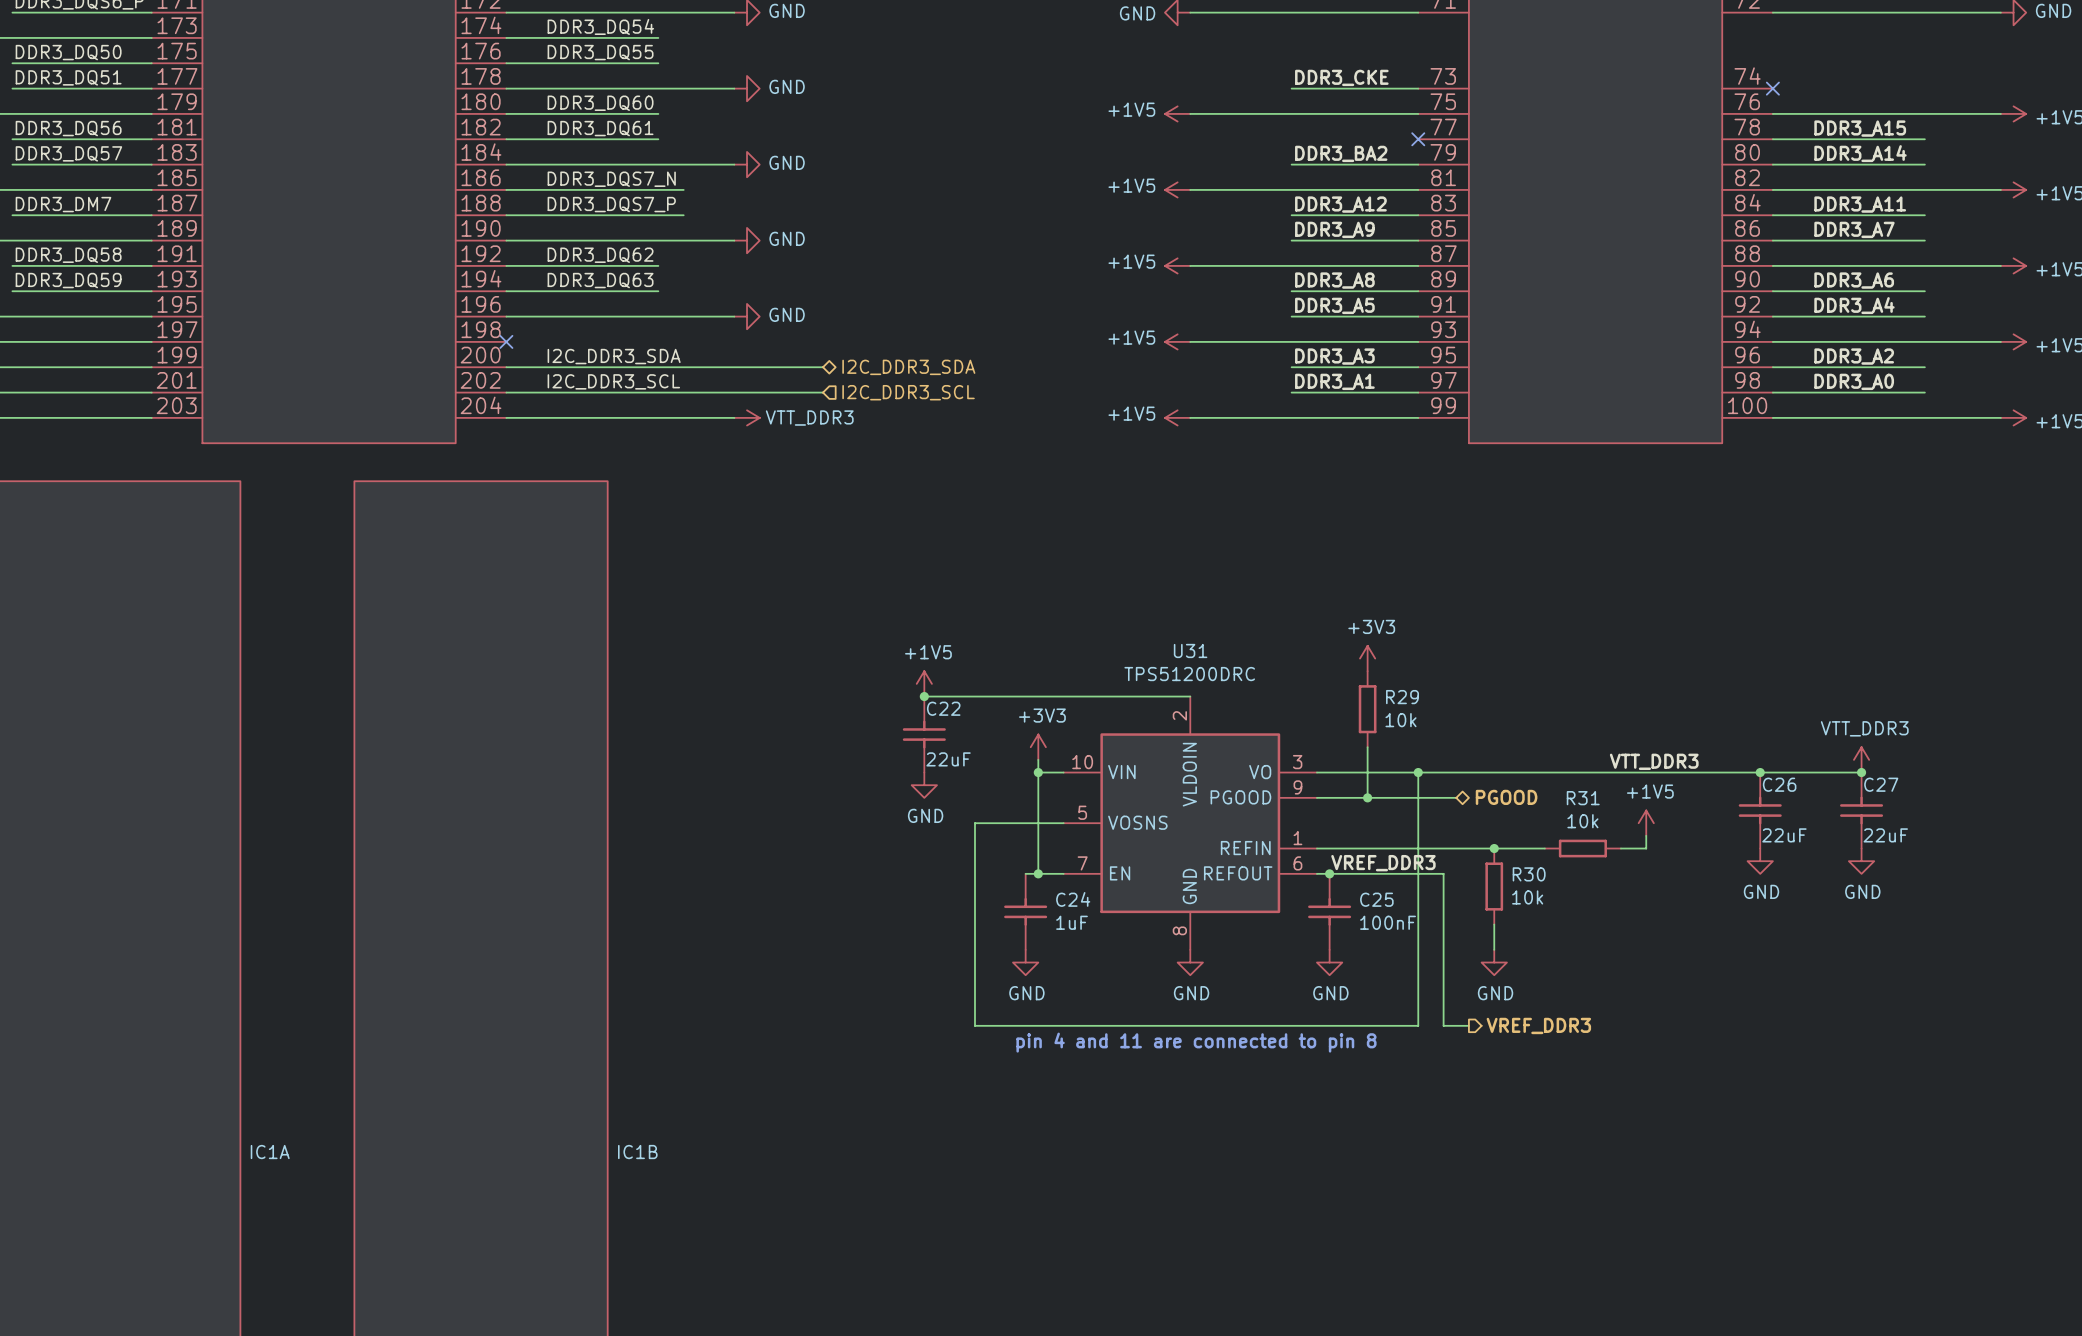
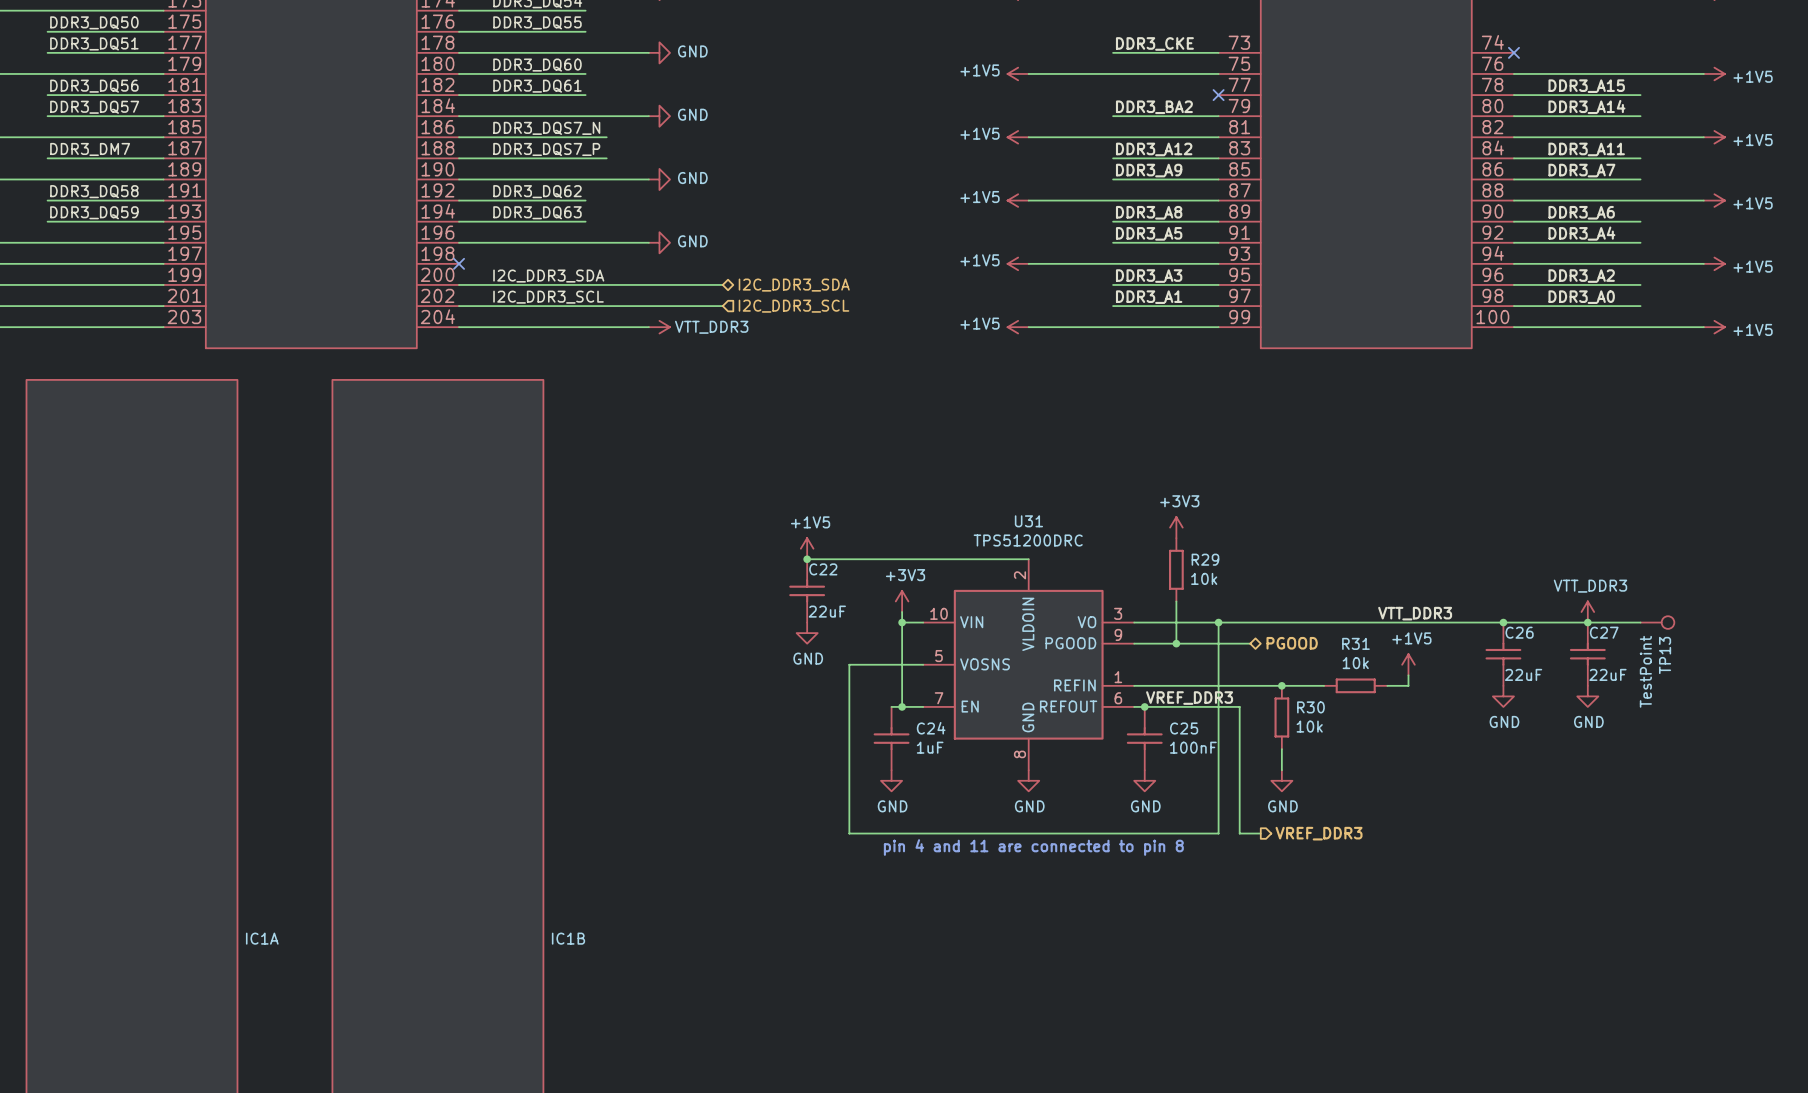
wire: none -> (1587, 622) (1640, 622)
TP13: none -> TestPoint (1657, 622)

